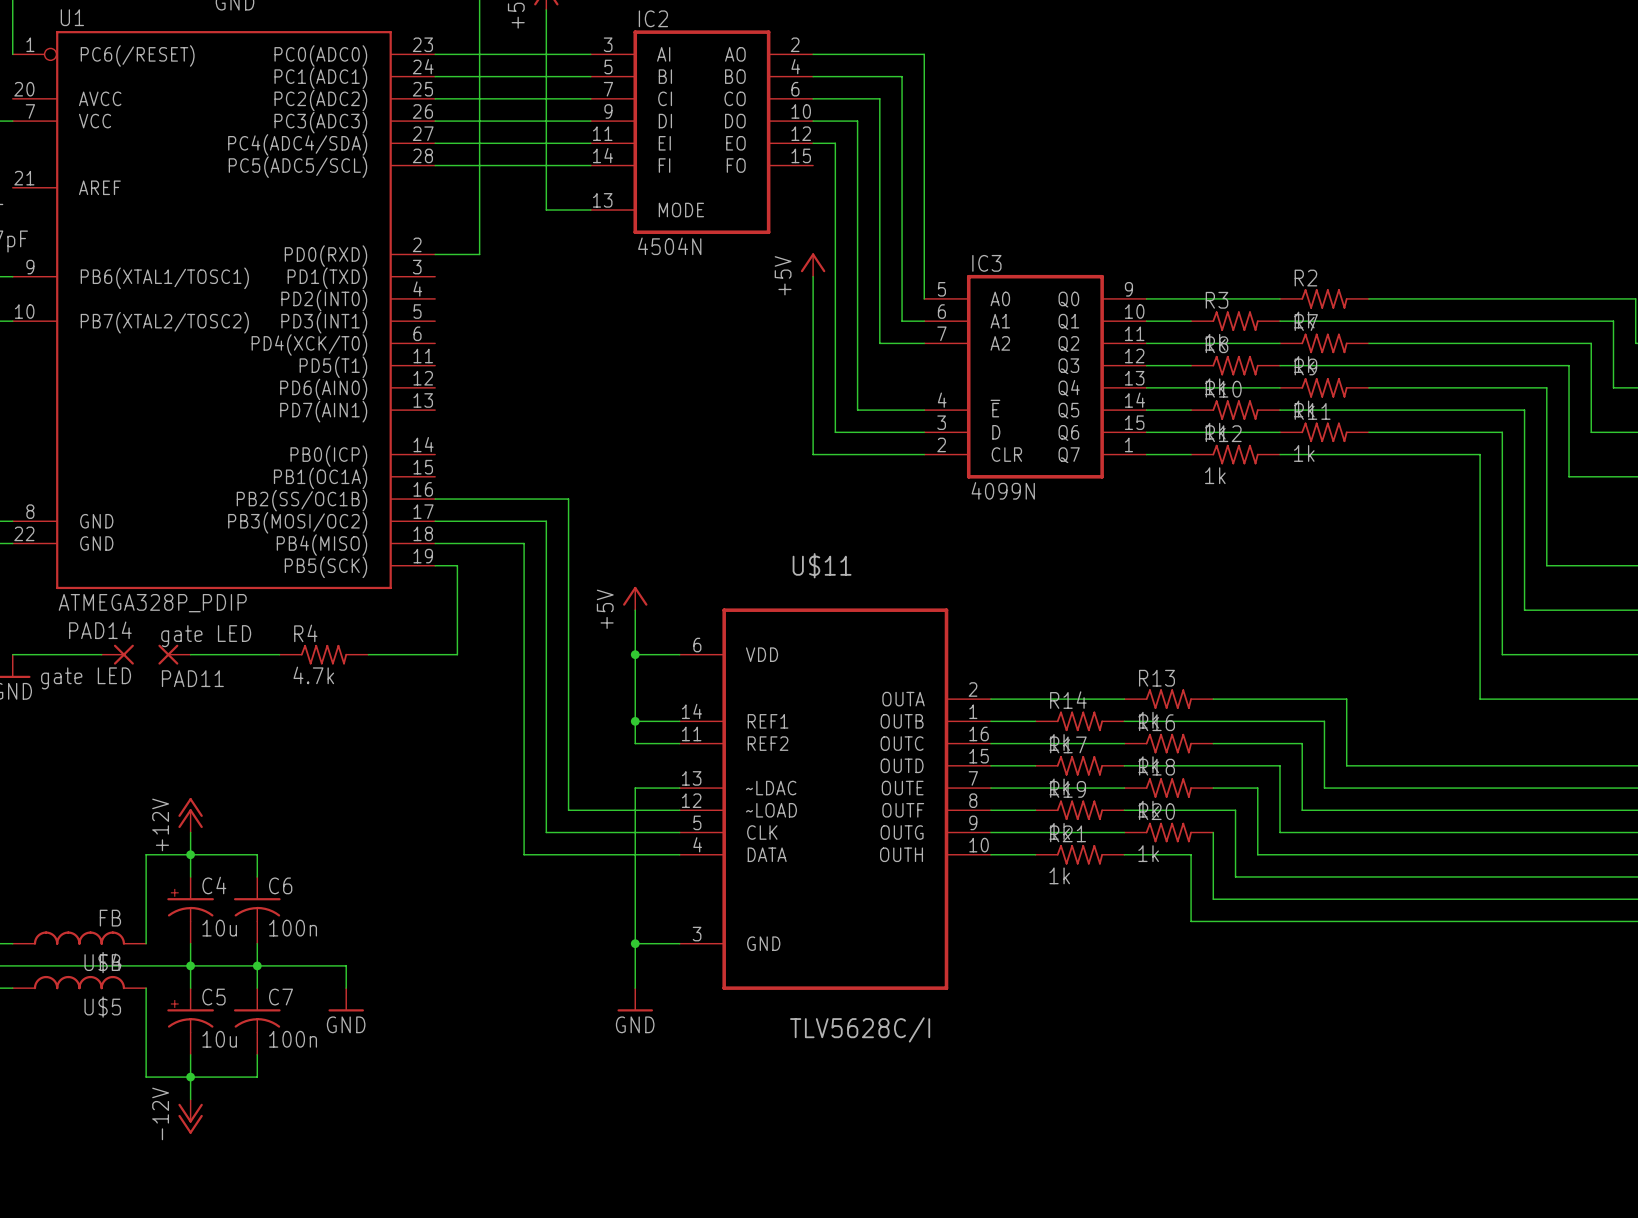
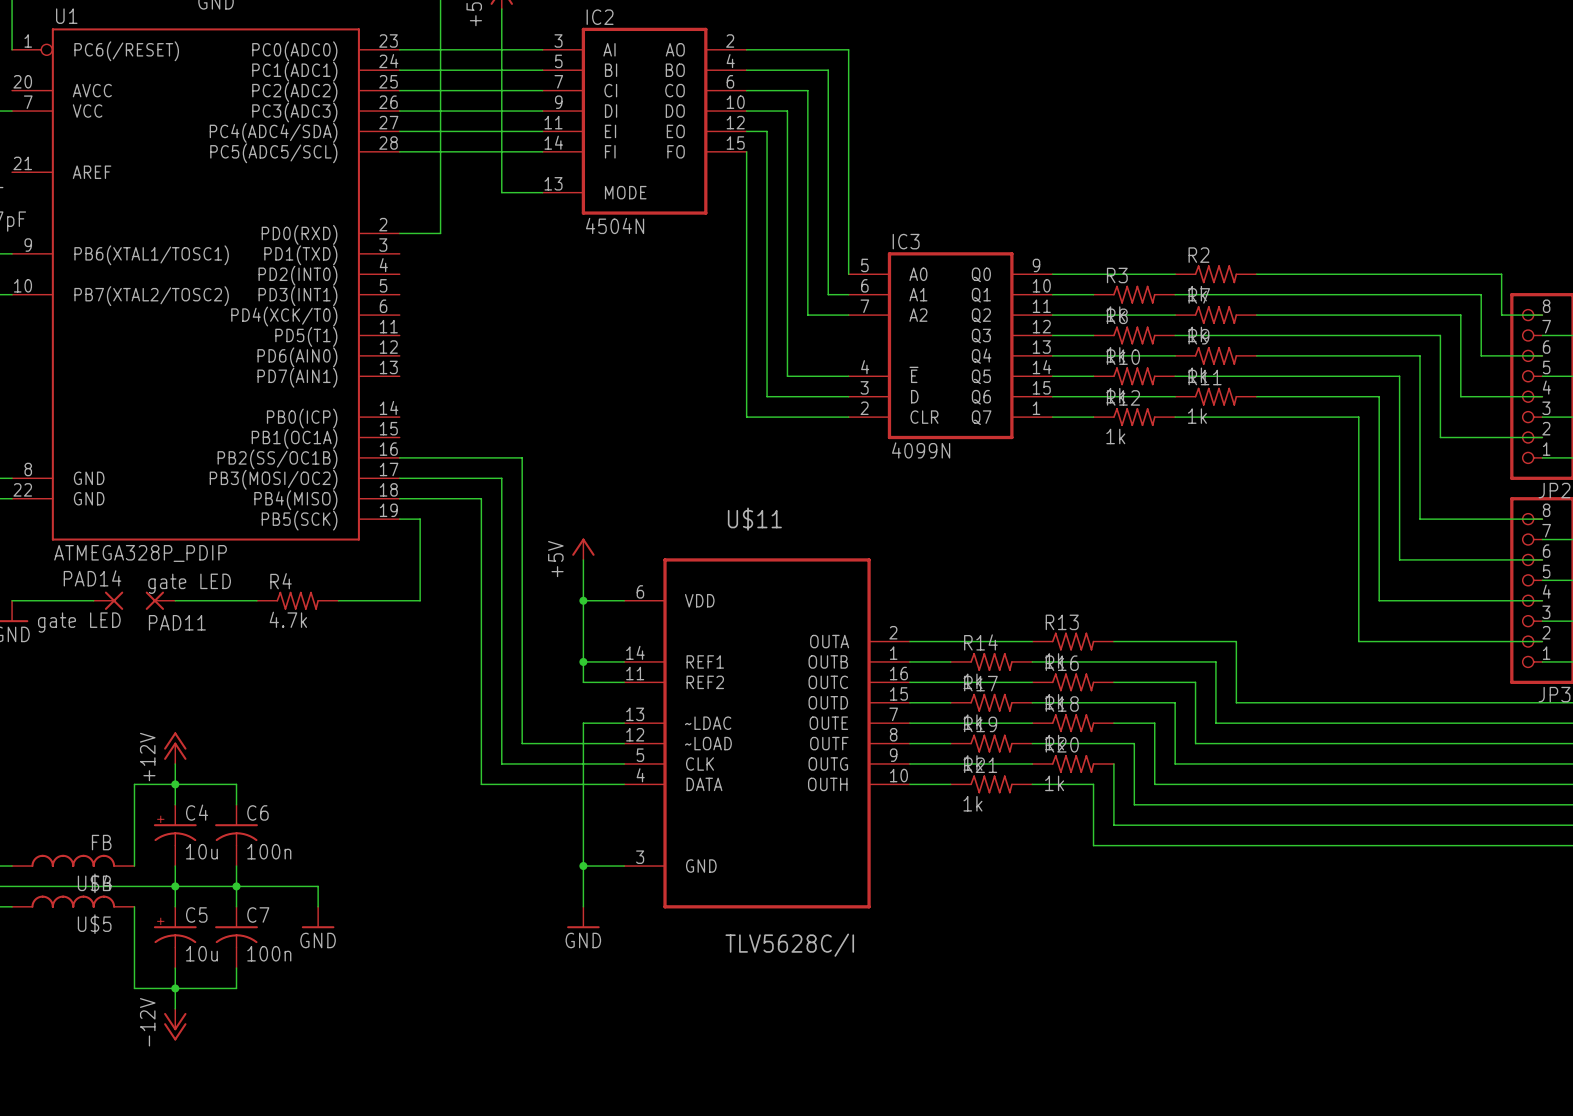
wire: none -> (746, 151) (746, 253)
power symbol: +5V (813, 265) -> none

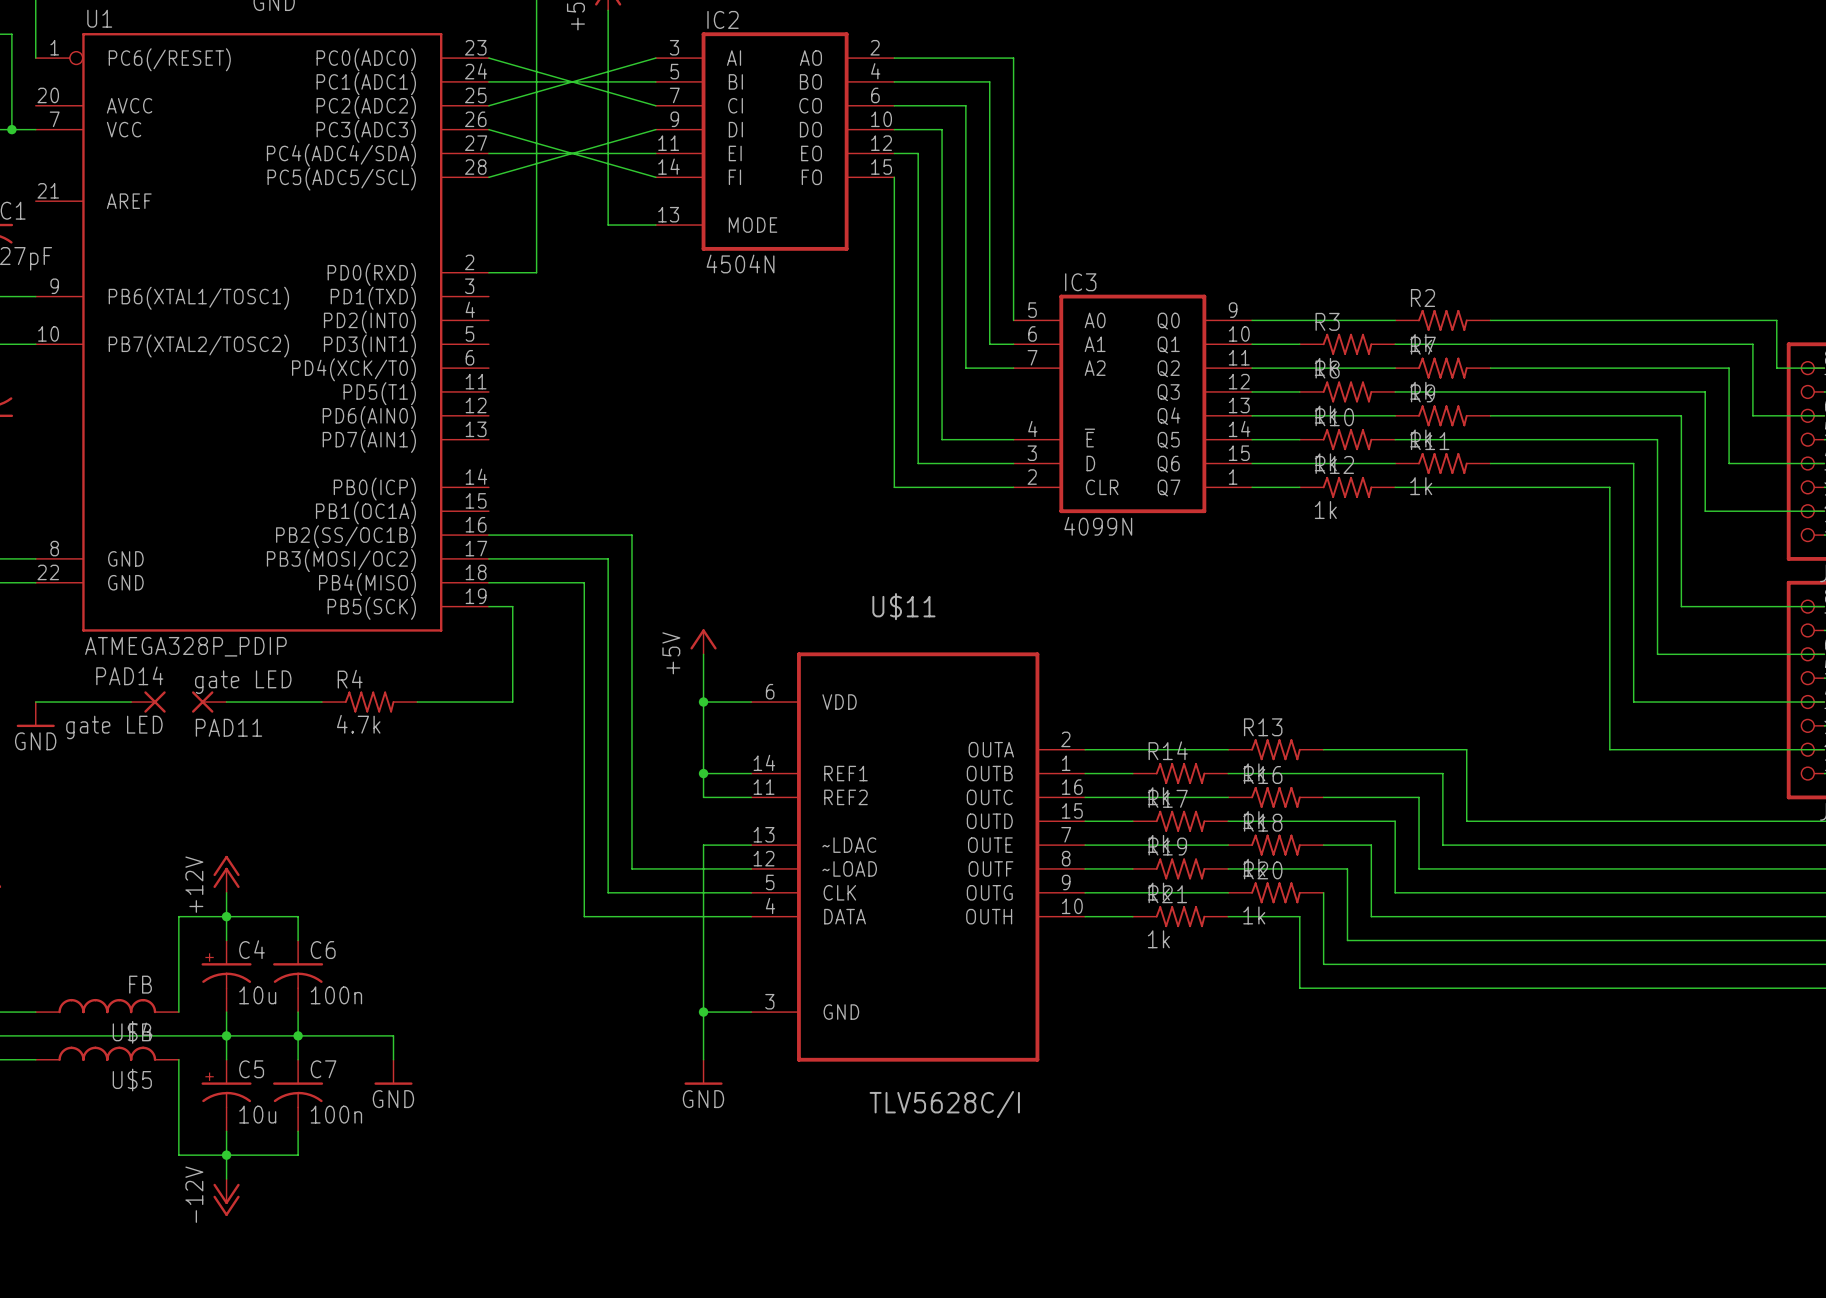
wire: (399, 49) (542, 49) -> (488, 58) (655, 105)
wire: (399, 90) (542, 90) -> (488, 105) (655, 58)
wire: (399, 111) (542, 111) -> (488, 129) (655, 177)
wire: (399, 151) (542, 151) -> (488, 177) (655, 129)

